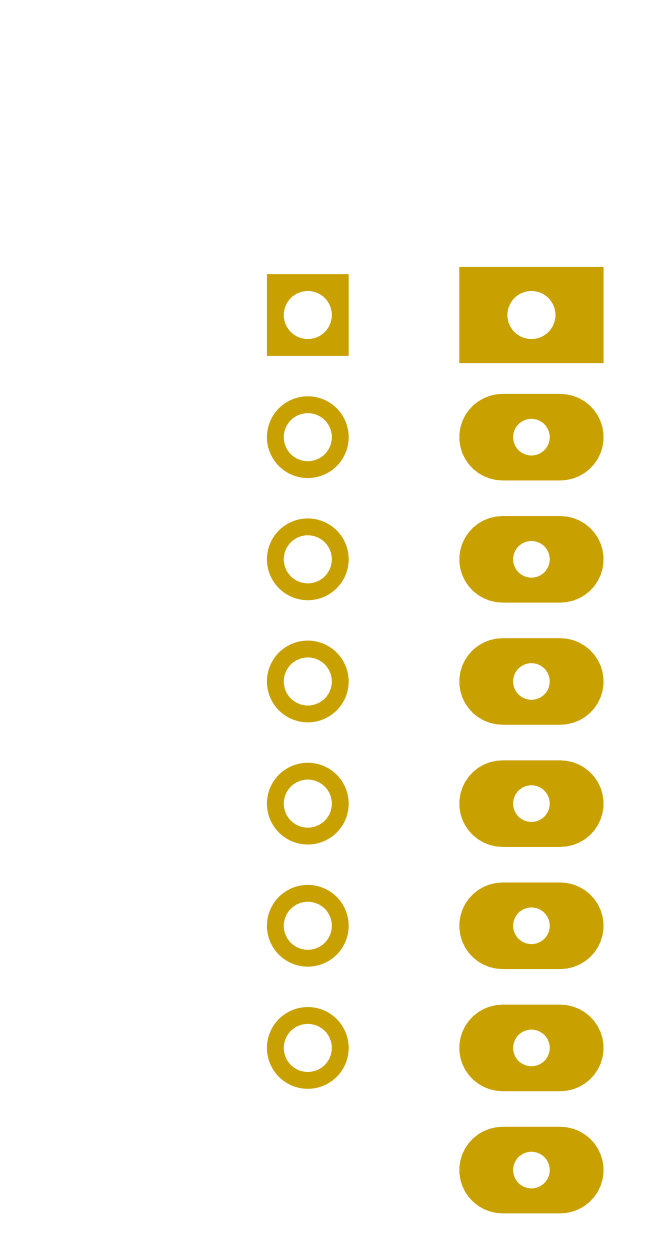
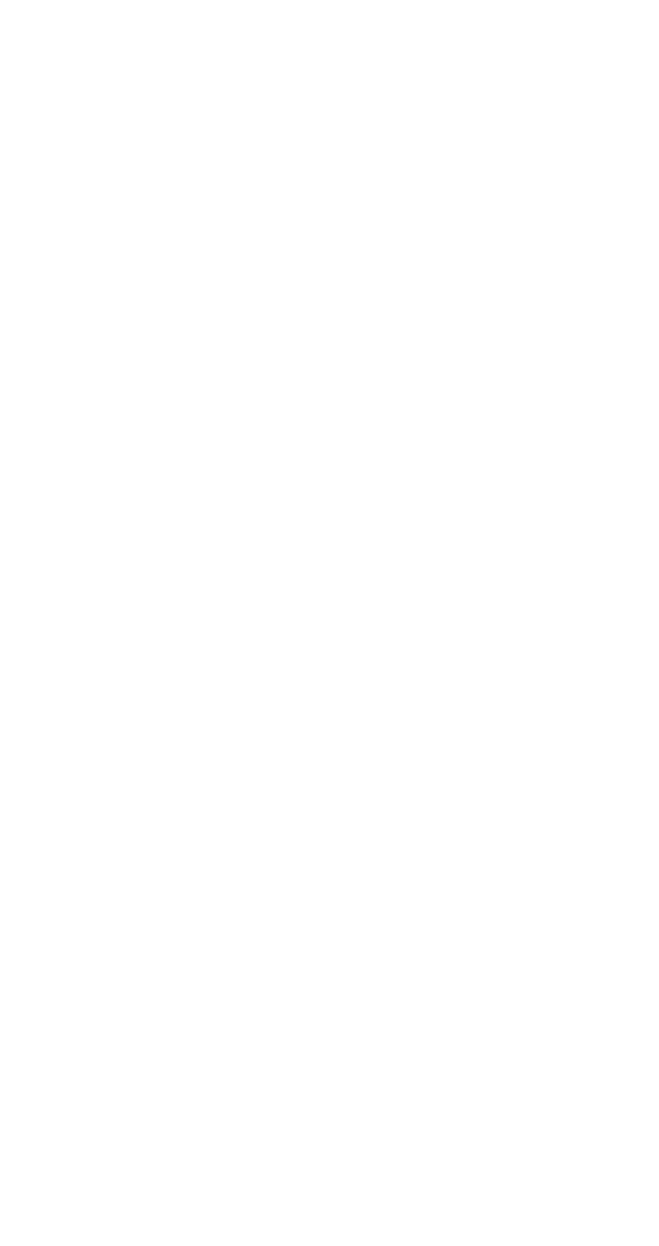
part: (307, 681) -> none
part: (531, 740) -> none

